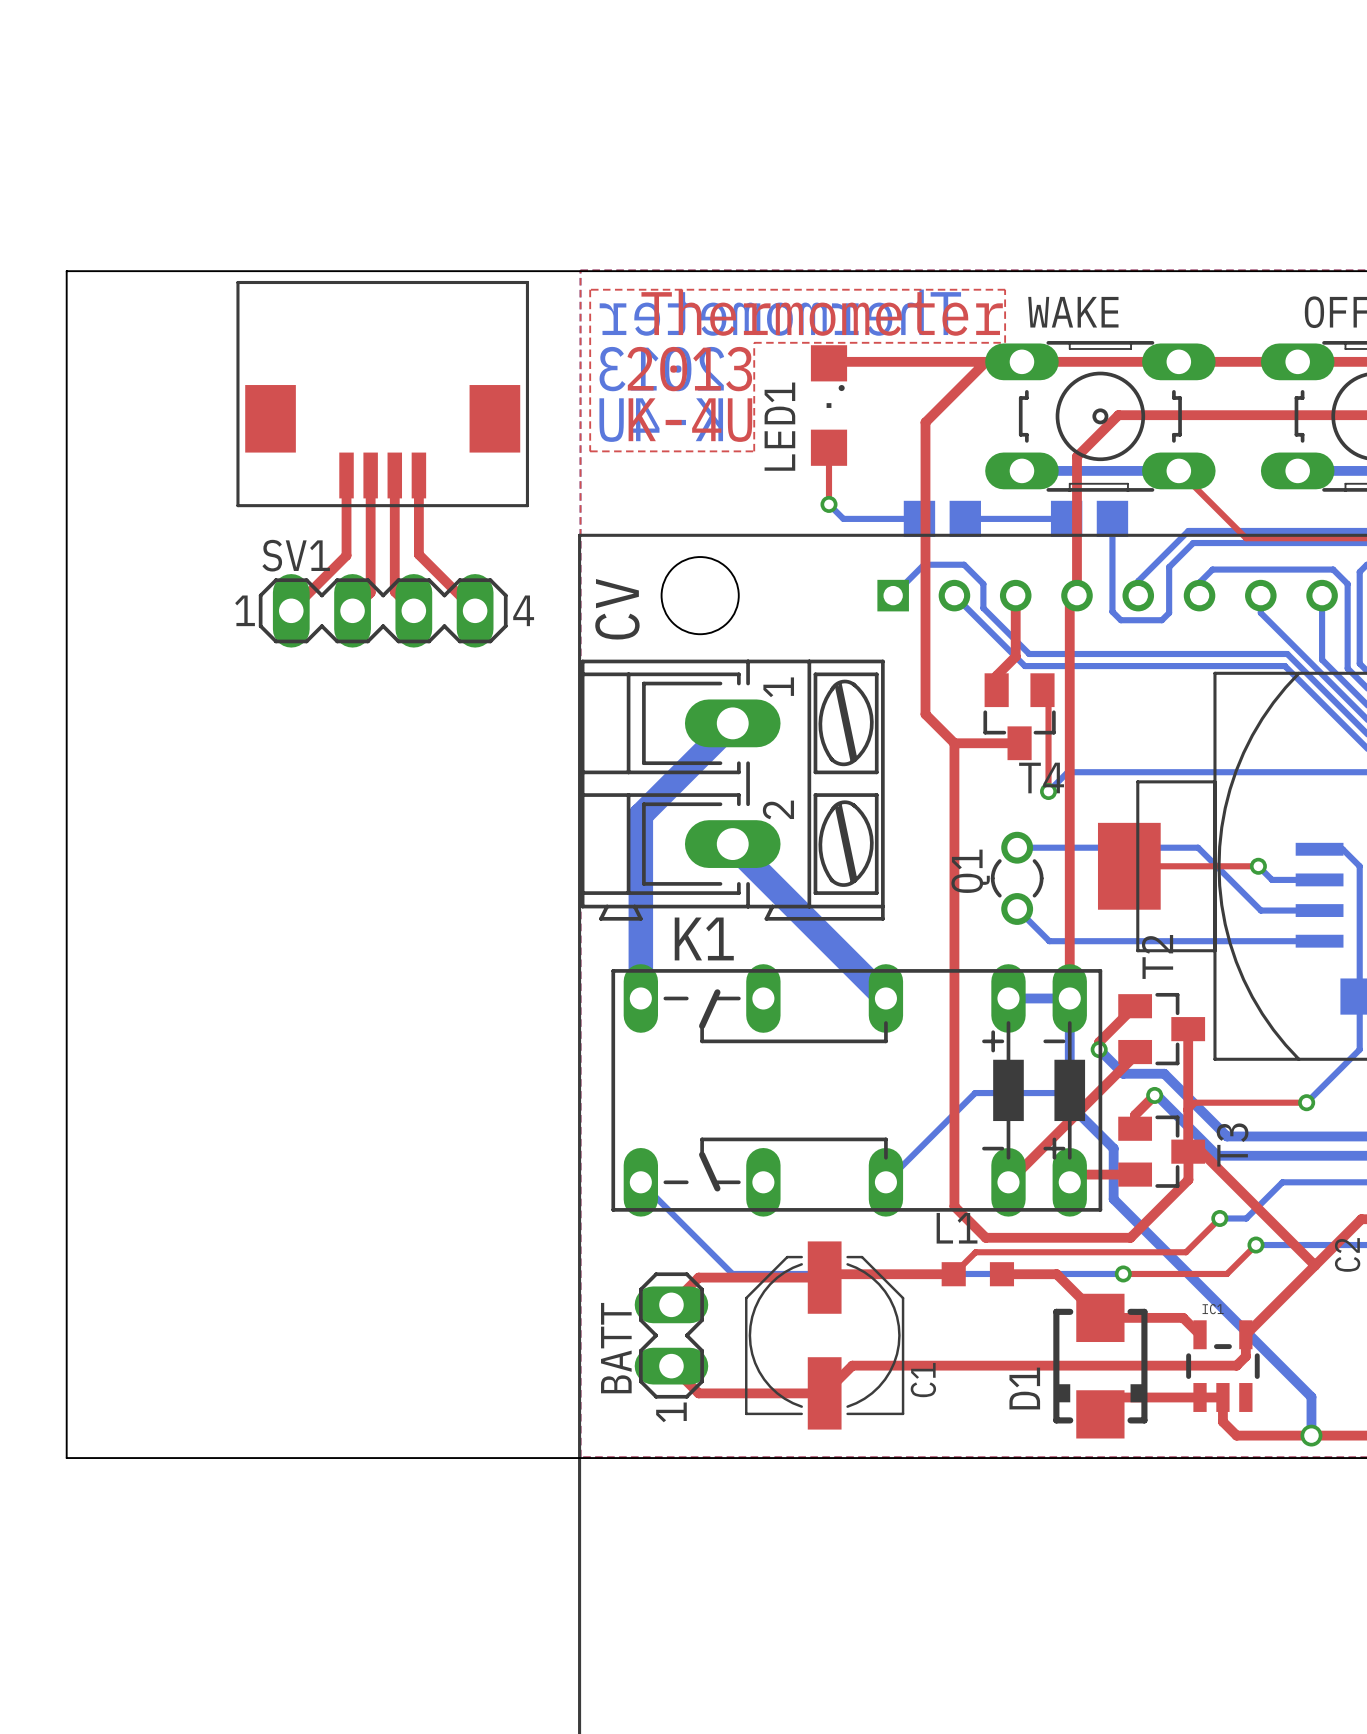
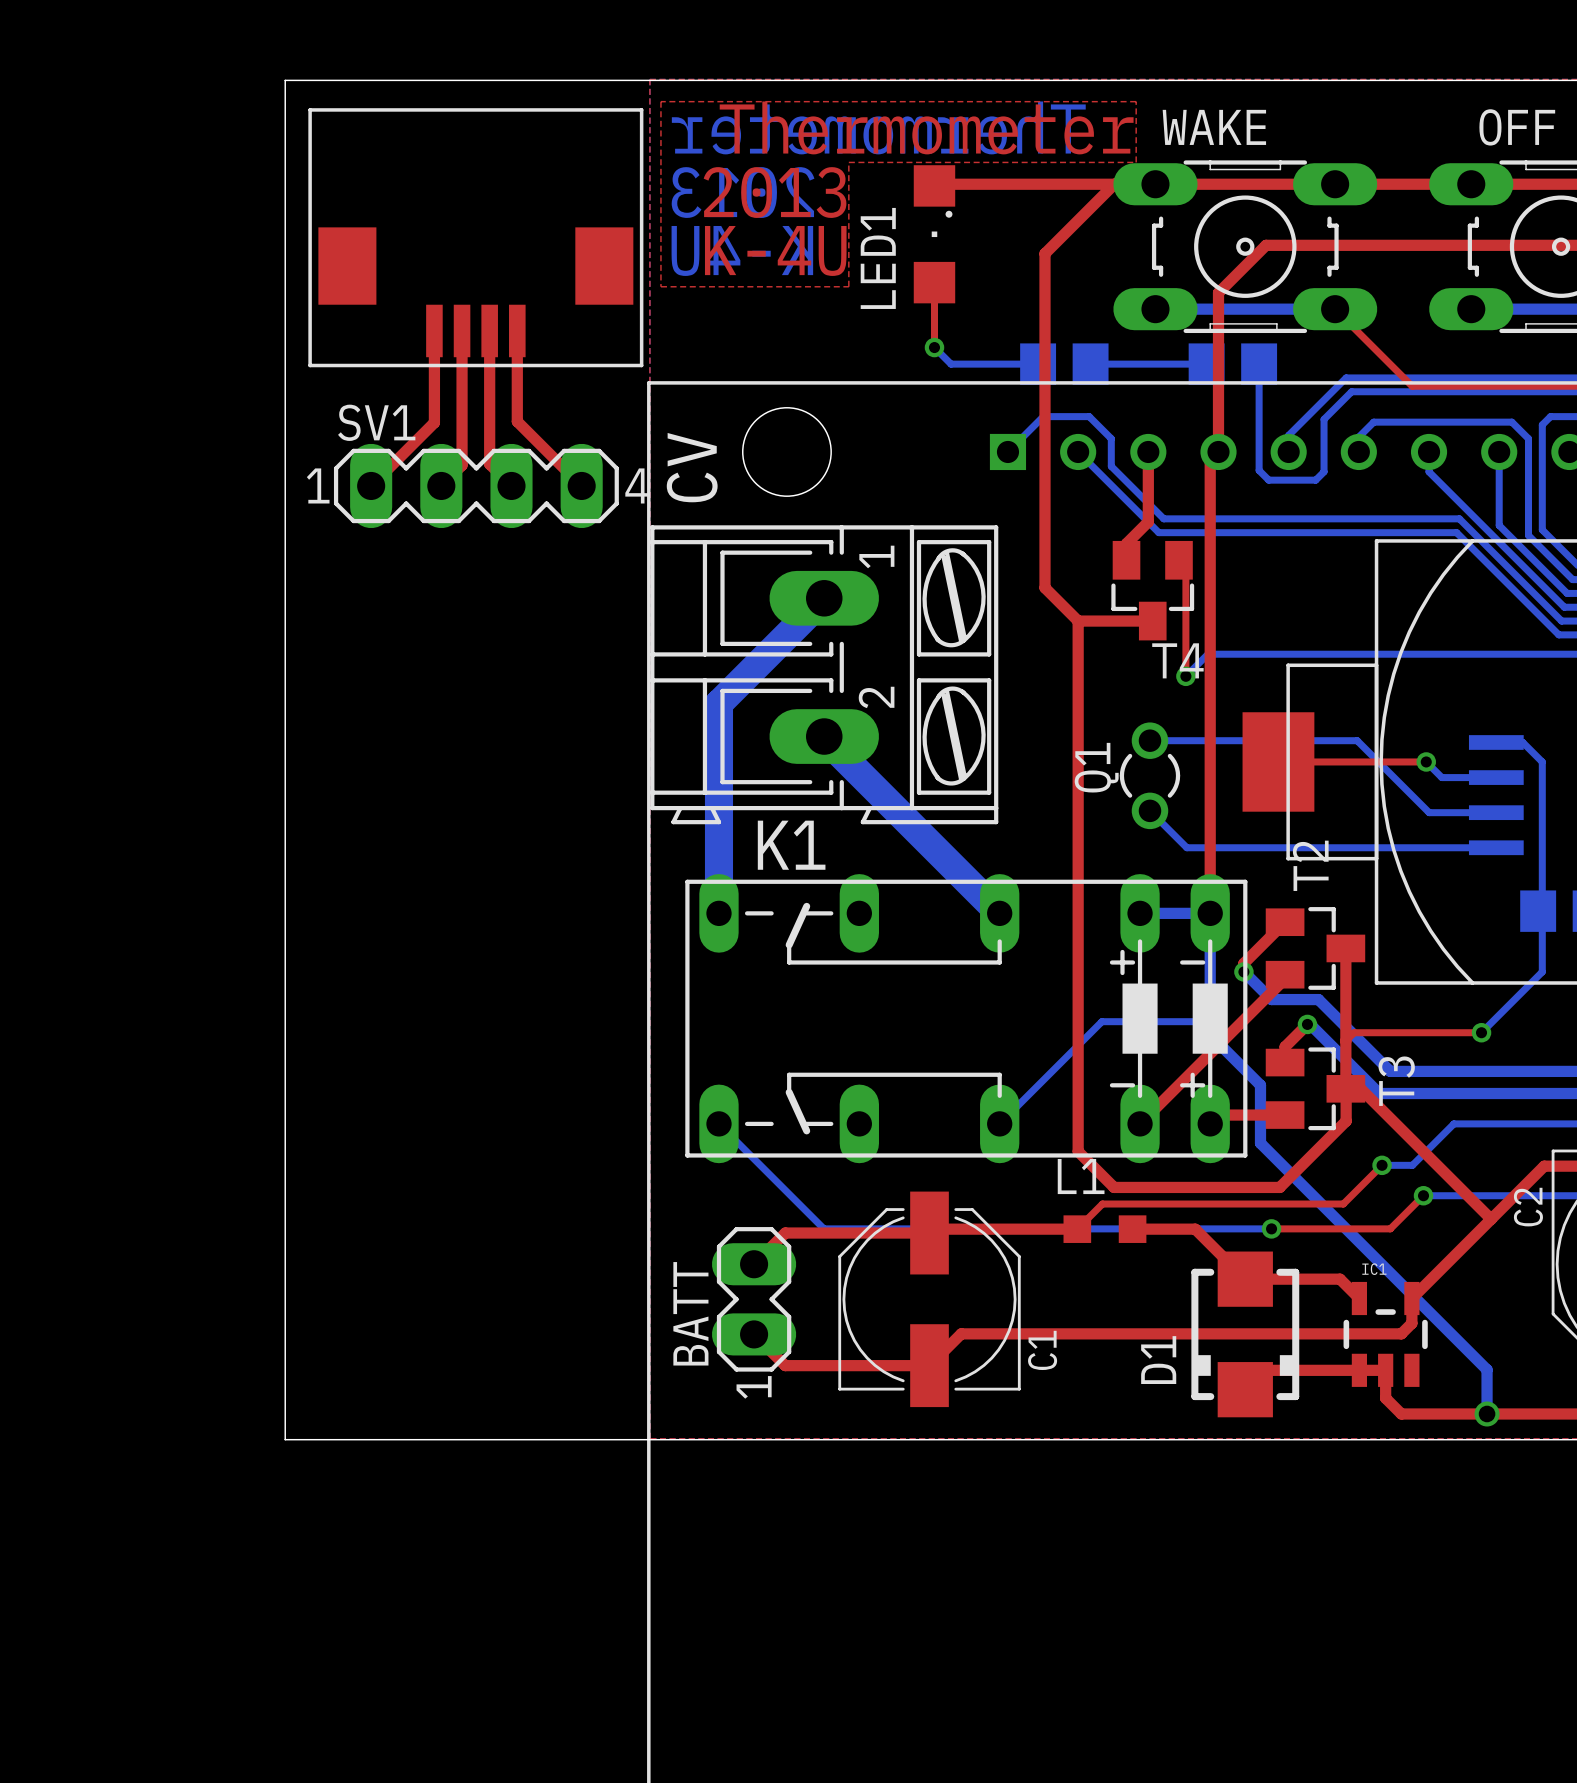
board edge: (262, 271) (66, 271) (66, 1458) (262, 1458) -> (285, 80) (285, 1439)
part position: (382, 394) -> (475, 237)
top track: (346, 475) (346, 555) (291, 610) -> (434, 330) (434, 422) (371, 485)
top track: (370, 475) (370, 592) (352, 610) -> (462, 330) (462, 465) (441, 485)
top track: (394, 475) (394, 591) (413, 610) -> (489, 330) (489, 464) (511, 485)
top track: (418, 475) (418, 554) (475, 610) -> (517, 330) (517, 421) (581, 485)
SV1 position: (383, 610) -> (476, 485)

